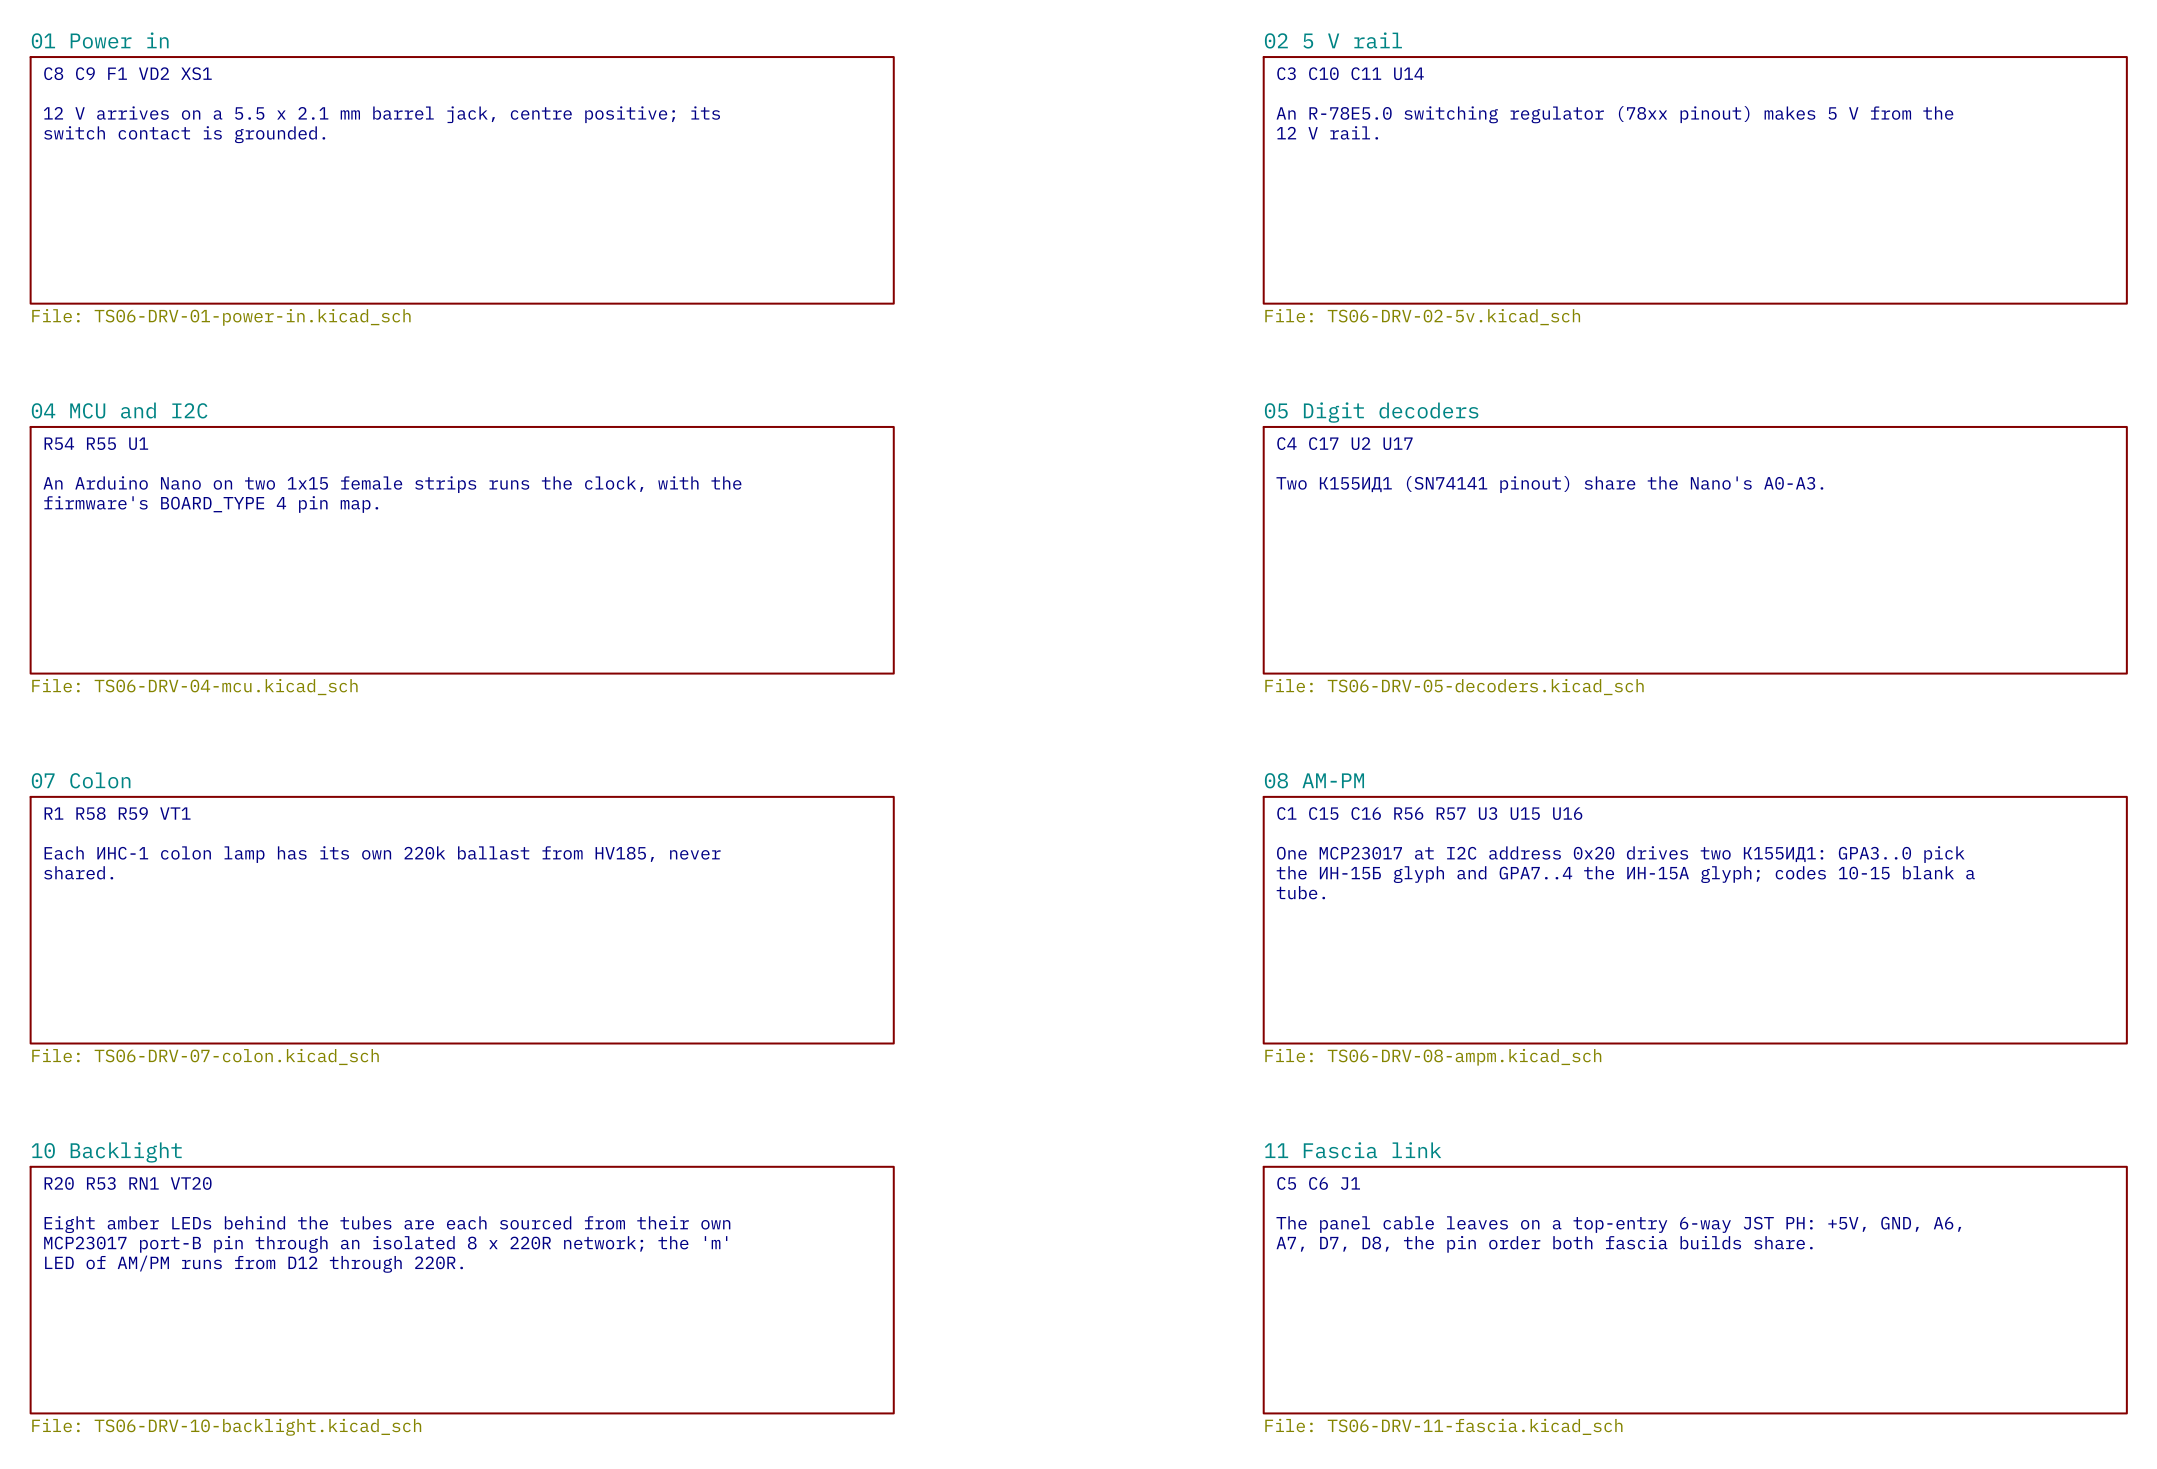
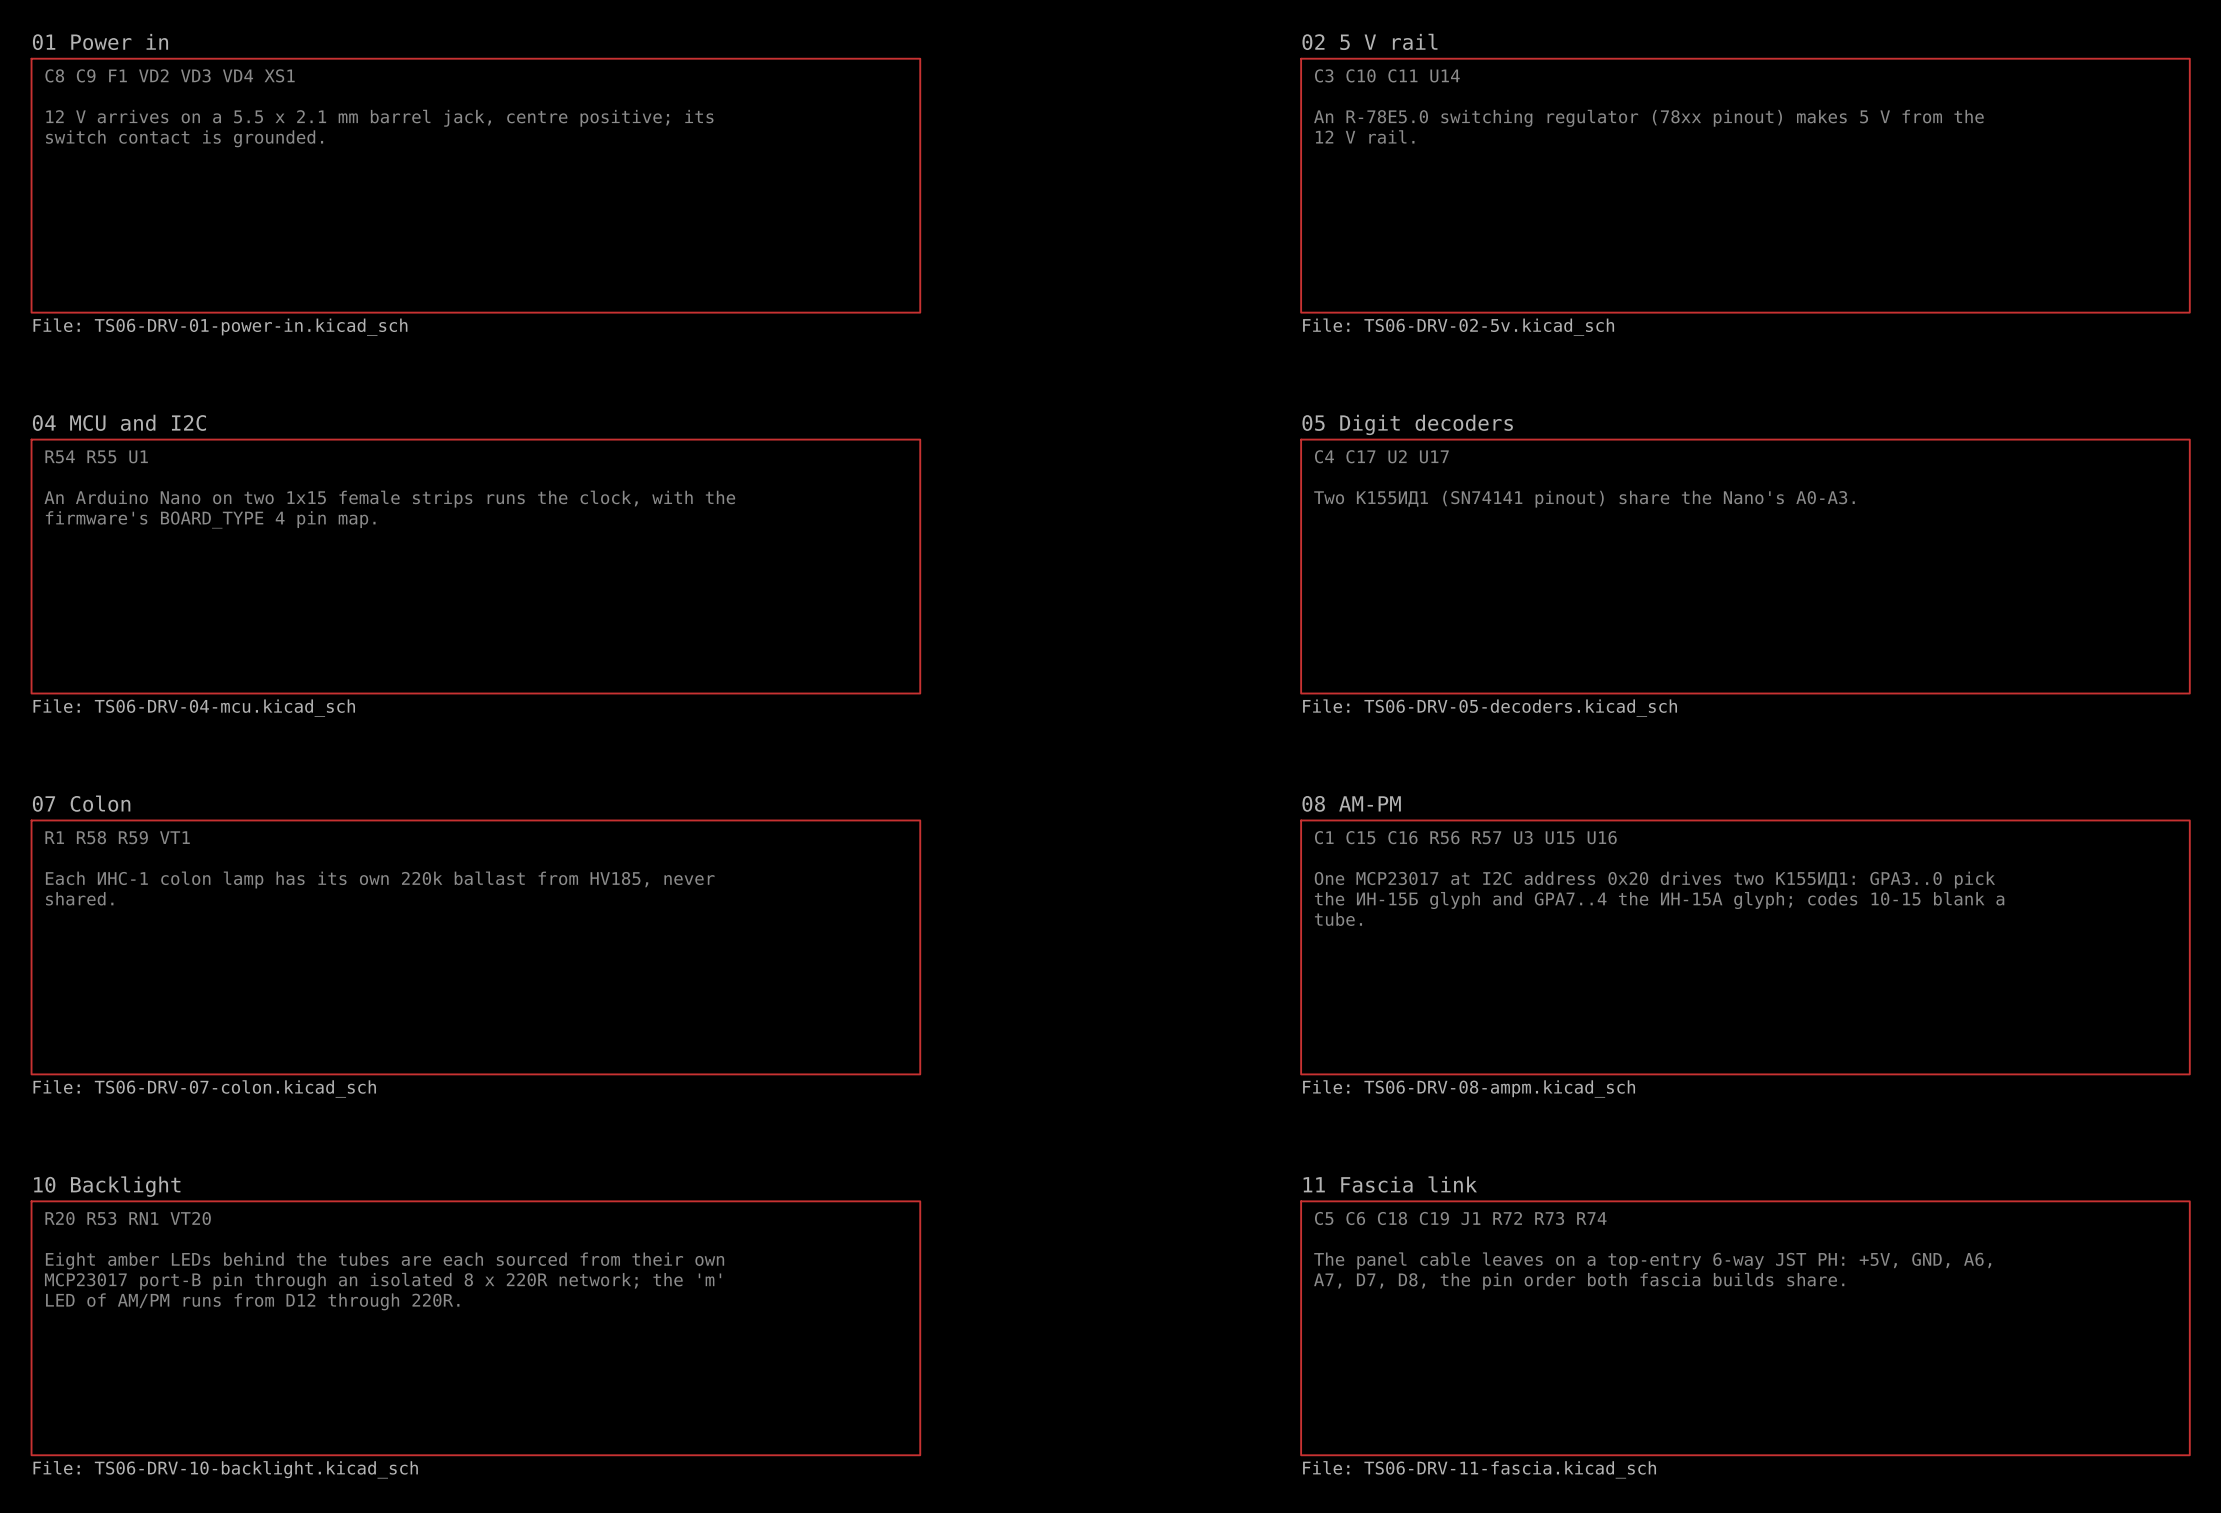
text: C8 C9 F1 VD2 XS1 (127, 73) -> C8 C9 F1 VD2 VD3 VD4 XS1 (170, 75)
text: C5 C6 J1 (1318, 1183) -> C5 C6 C18 C19 J1 R72 R73 R74 (1460, 1218)

